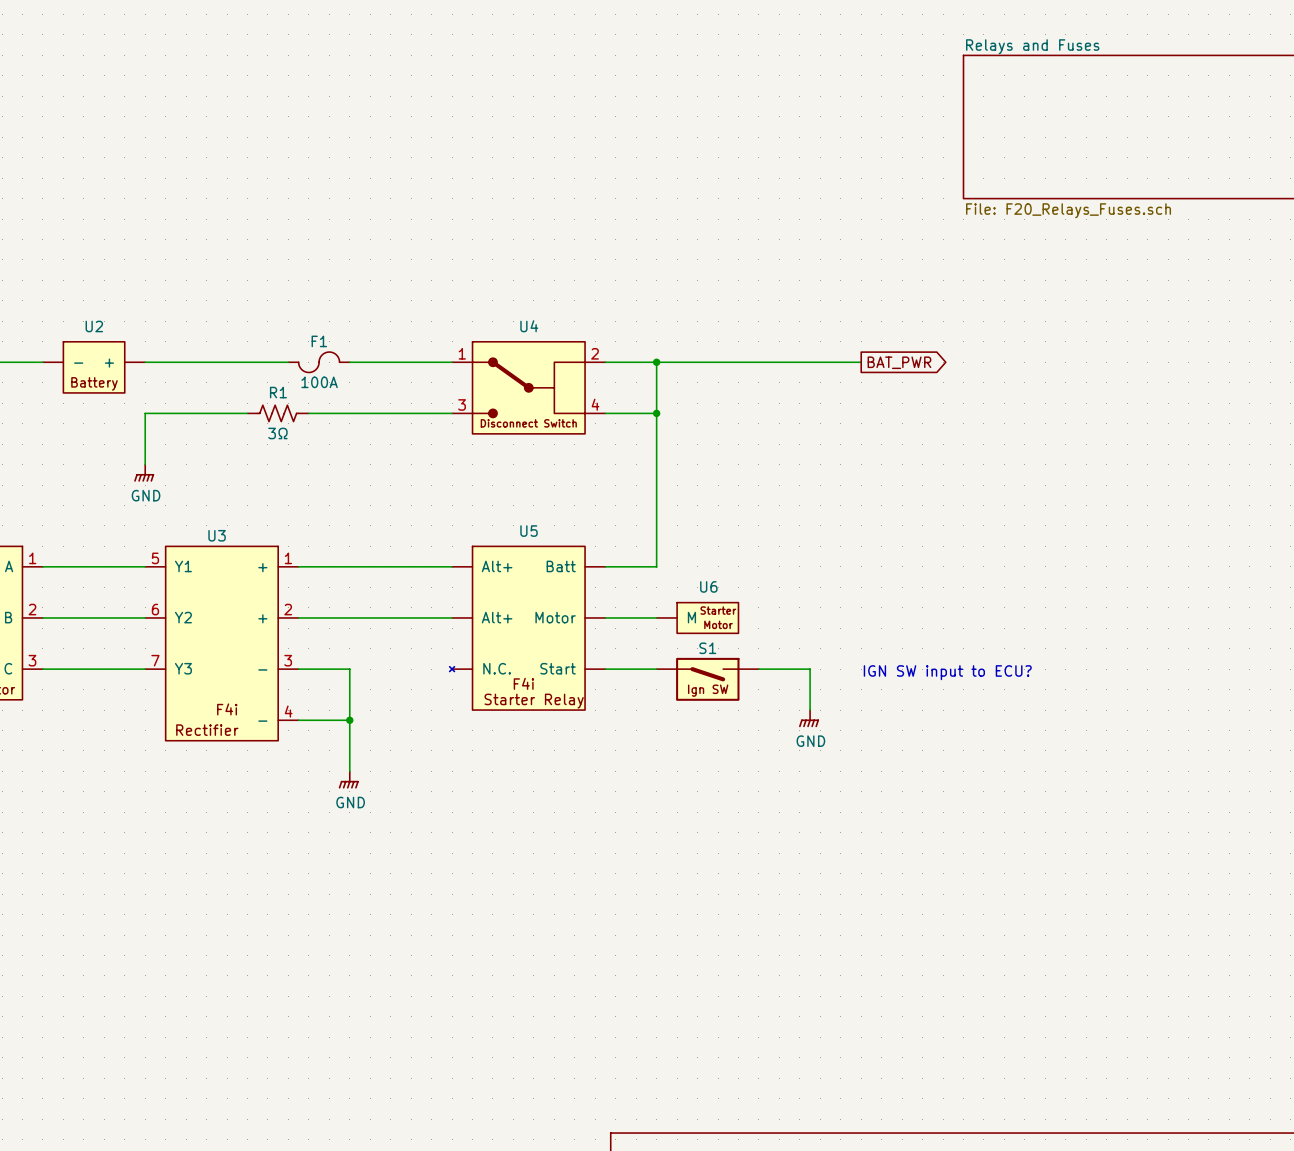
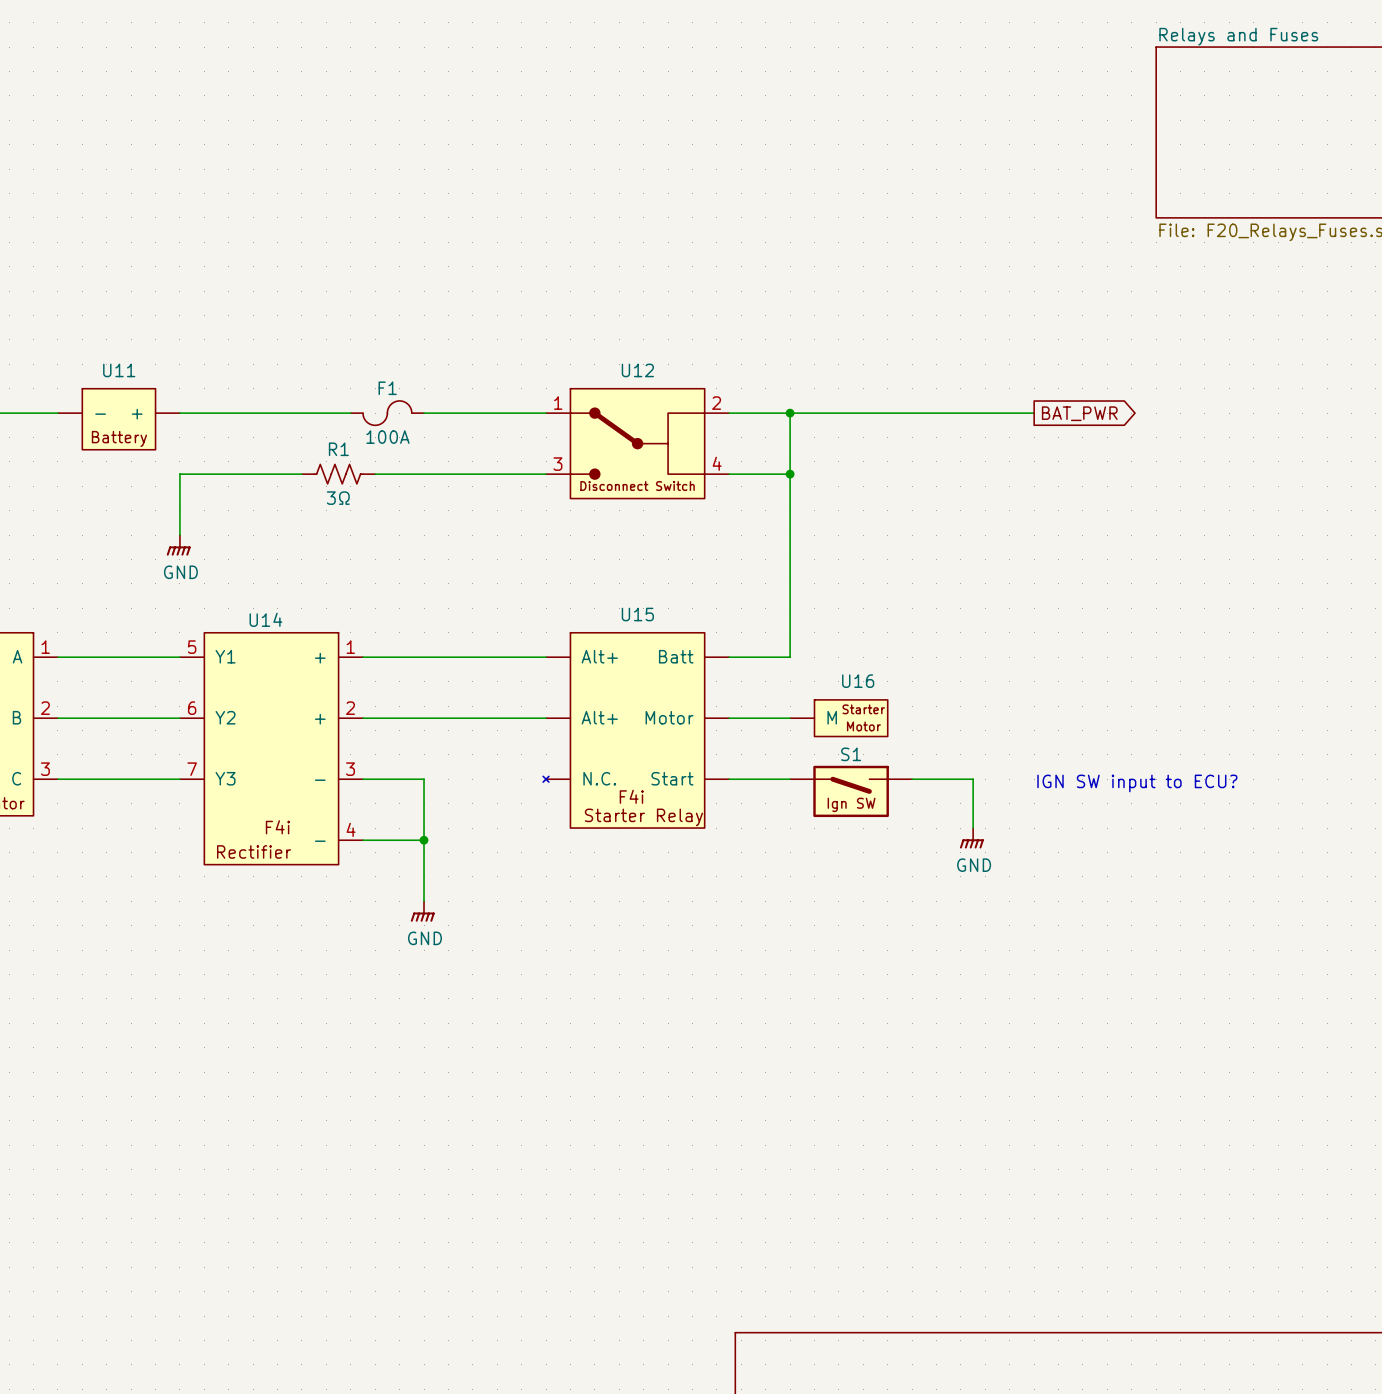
U2 name: U2 (94, 326) -> U11 (119, 370)
U4 name: U4 (529, 326) -> U12 (637, 370)
U5 name: U5 (529, 531) -> U15 (637, 614)
U3 name: U3 (217, 535) -> U14 (265, 619)
U6 name: U6 (708, 586) -> U16 (858, 681)

